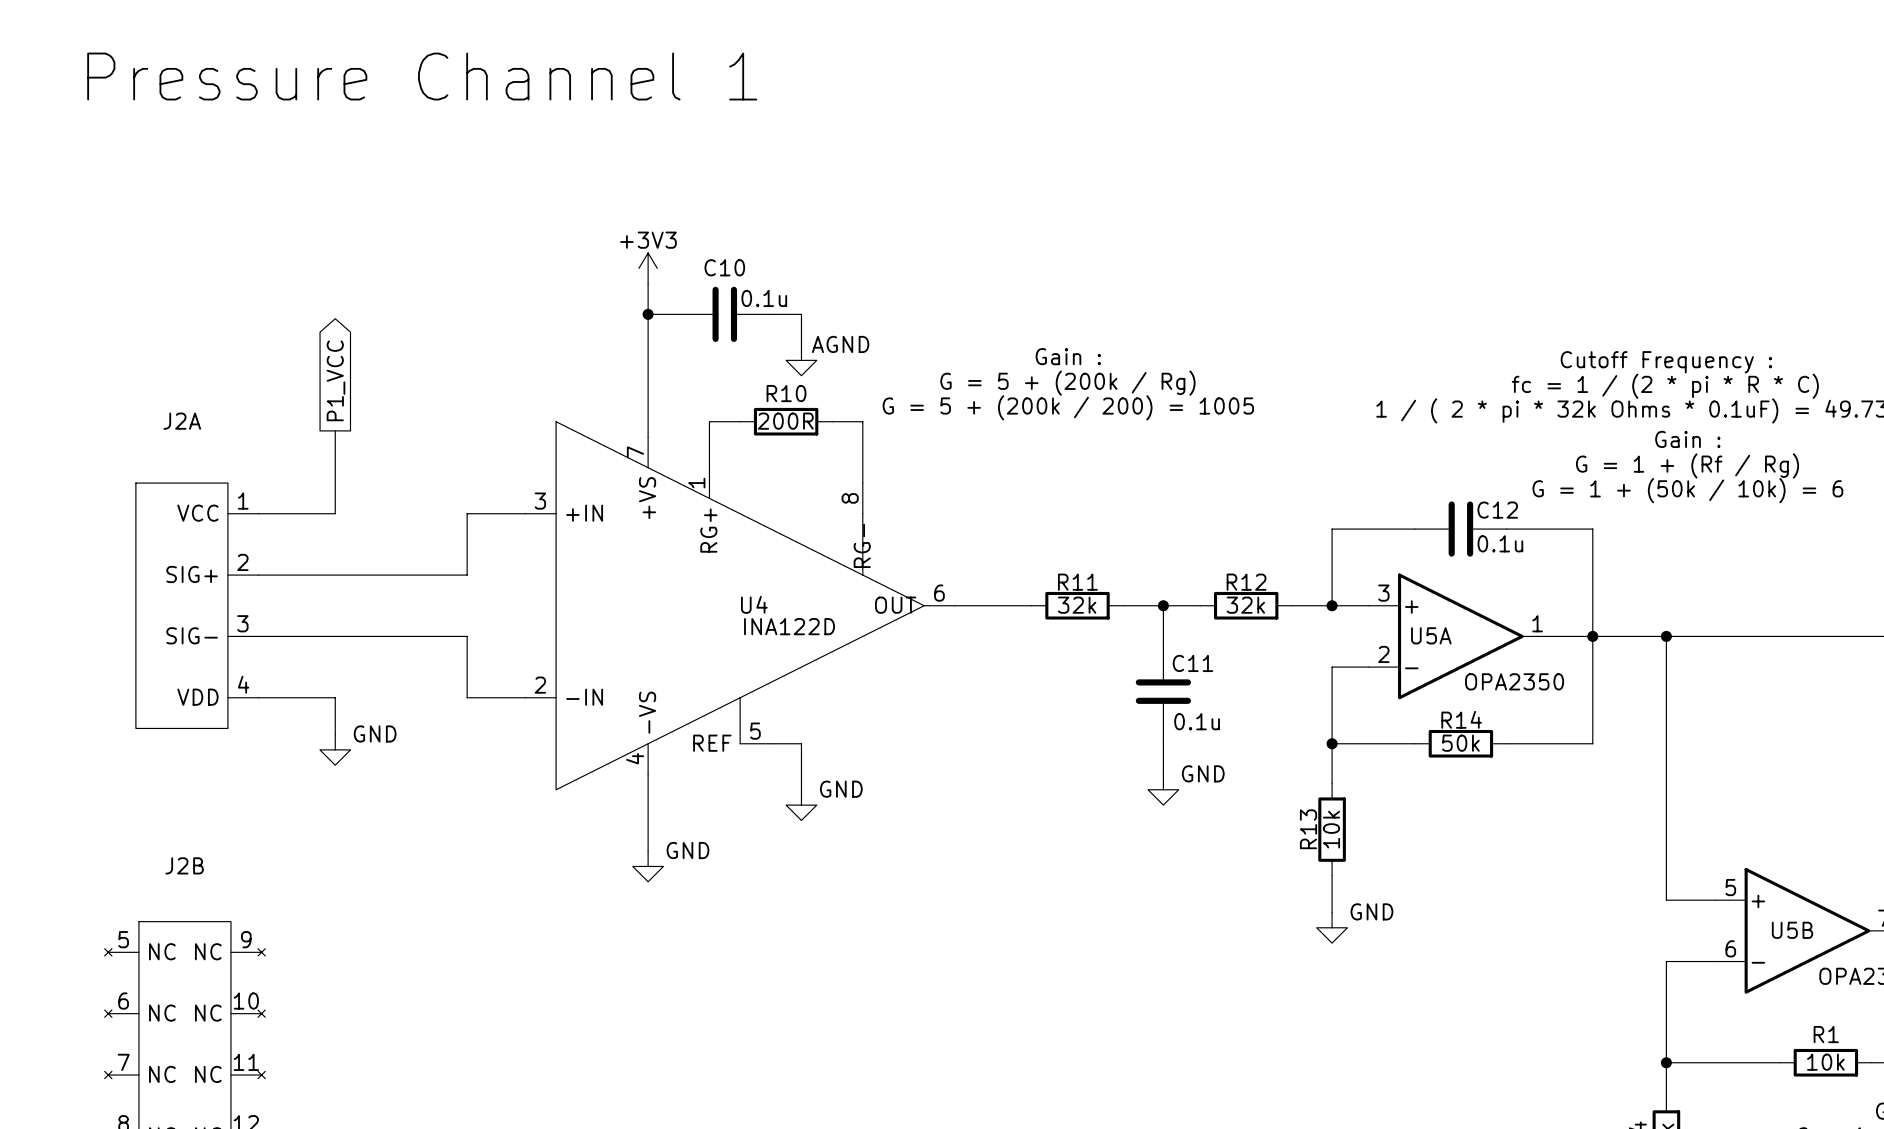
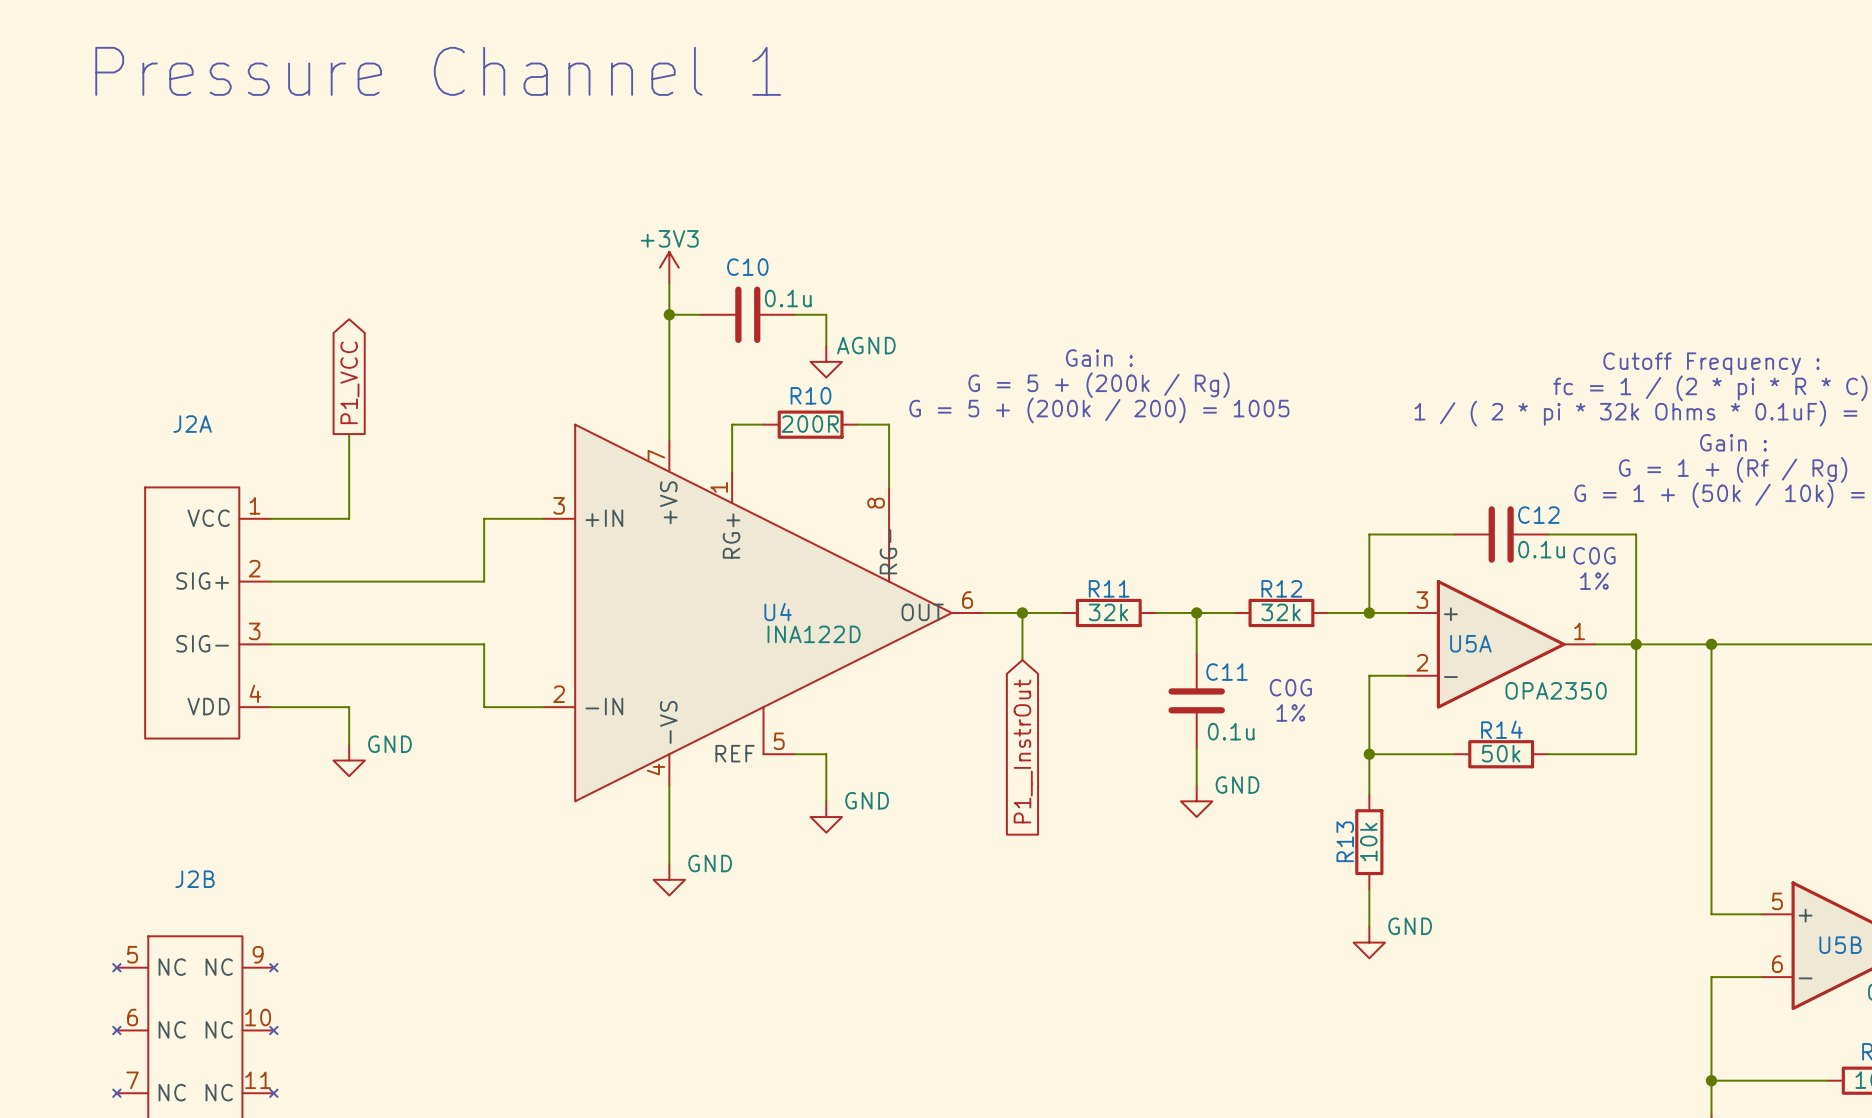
text: none -> C0G (1594, 555)
text: none -> 1% (1594, 581)
wire: none -> (1022, 612) (1022, 660)
junction: none -> (1022, 612)
text: none -> C0G (1290, 687)
text: none -> 1% (1290, 712)
global label: none -> P1__InstrOut (1023, 751)

